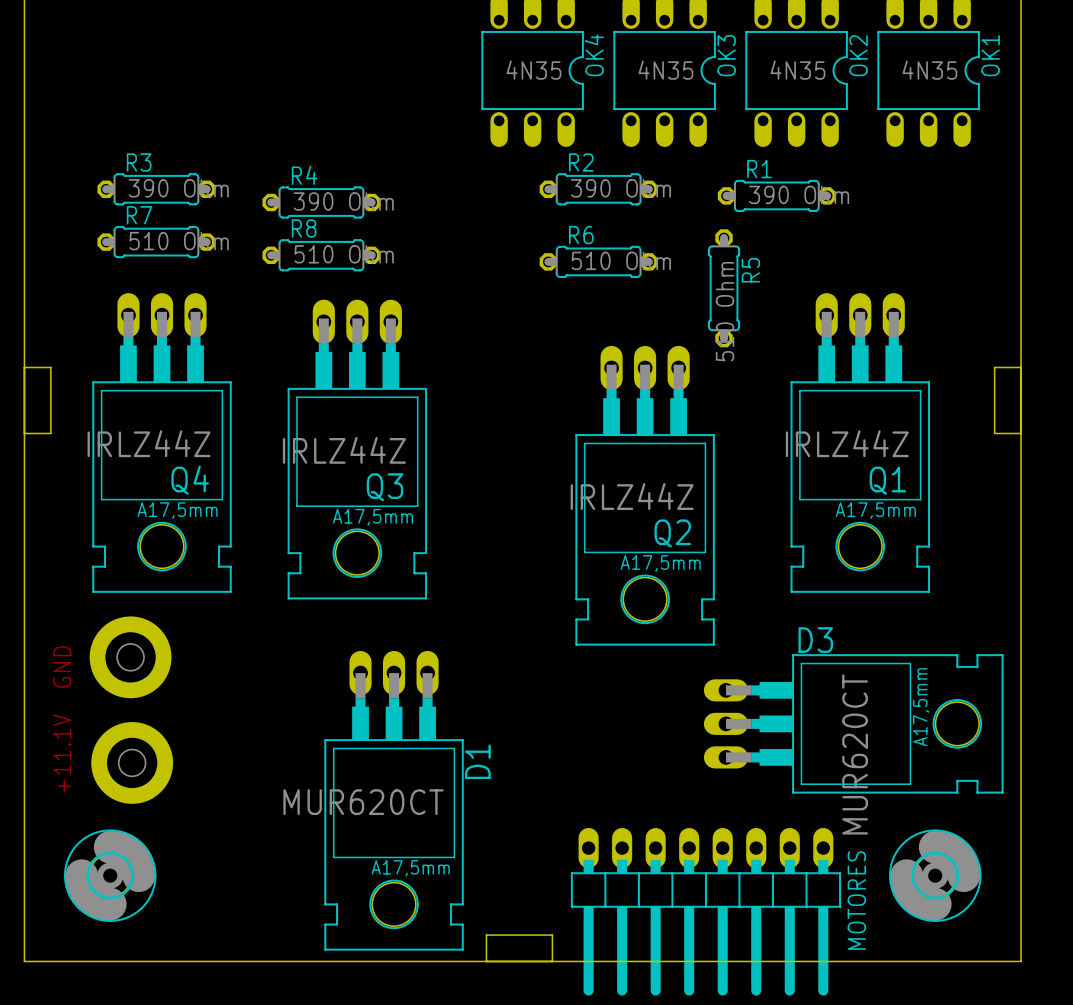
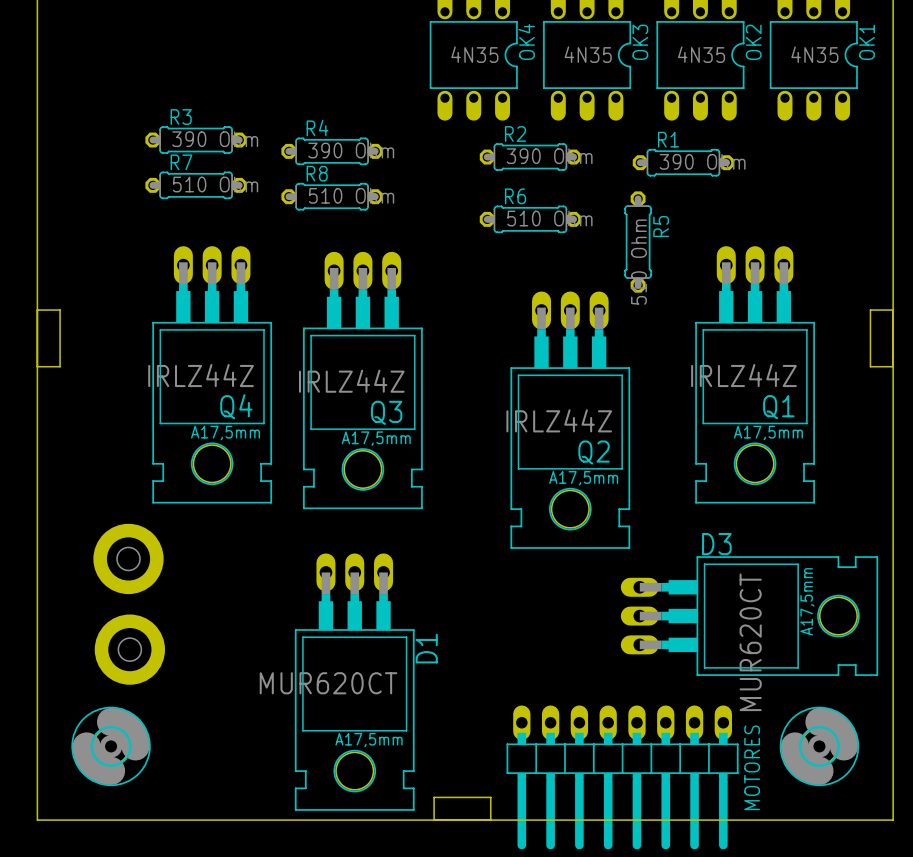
R3 position: (156, 189) -> (196, 140)
R4 position: (321, 202) -> (332, 151)
R7 position: (156, 242) -> (196, 185)
R8 position: (321, 255) -> (332, 196)
Q4 position: (161, 442) -> (212, 374)
Q3 position: (357, 449) -> (362, 380)
text: GND (62, 667) -> none
text: +11.1V (62, 753) -> none

